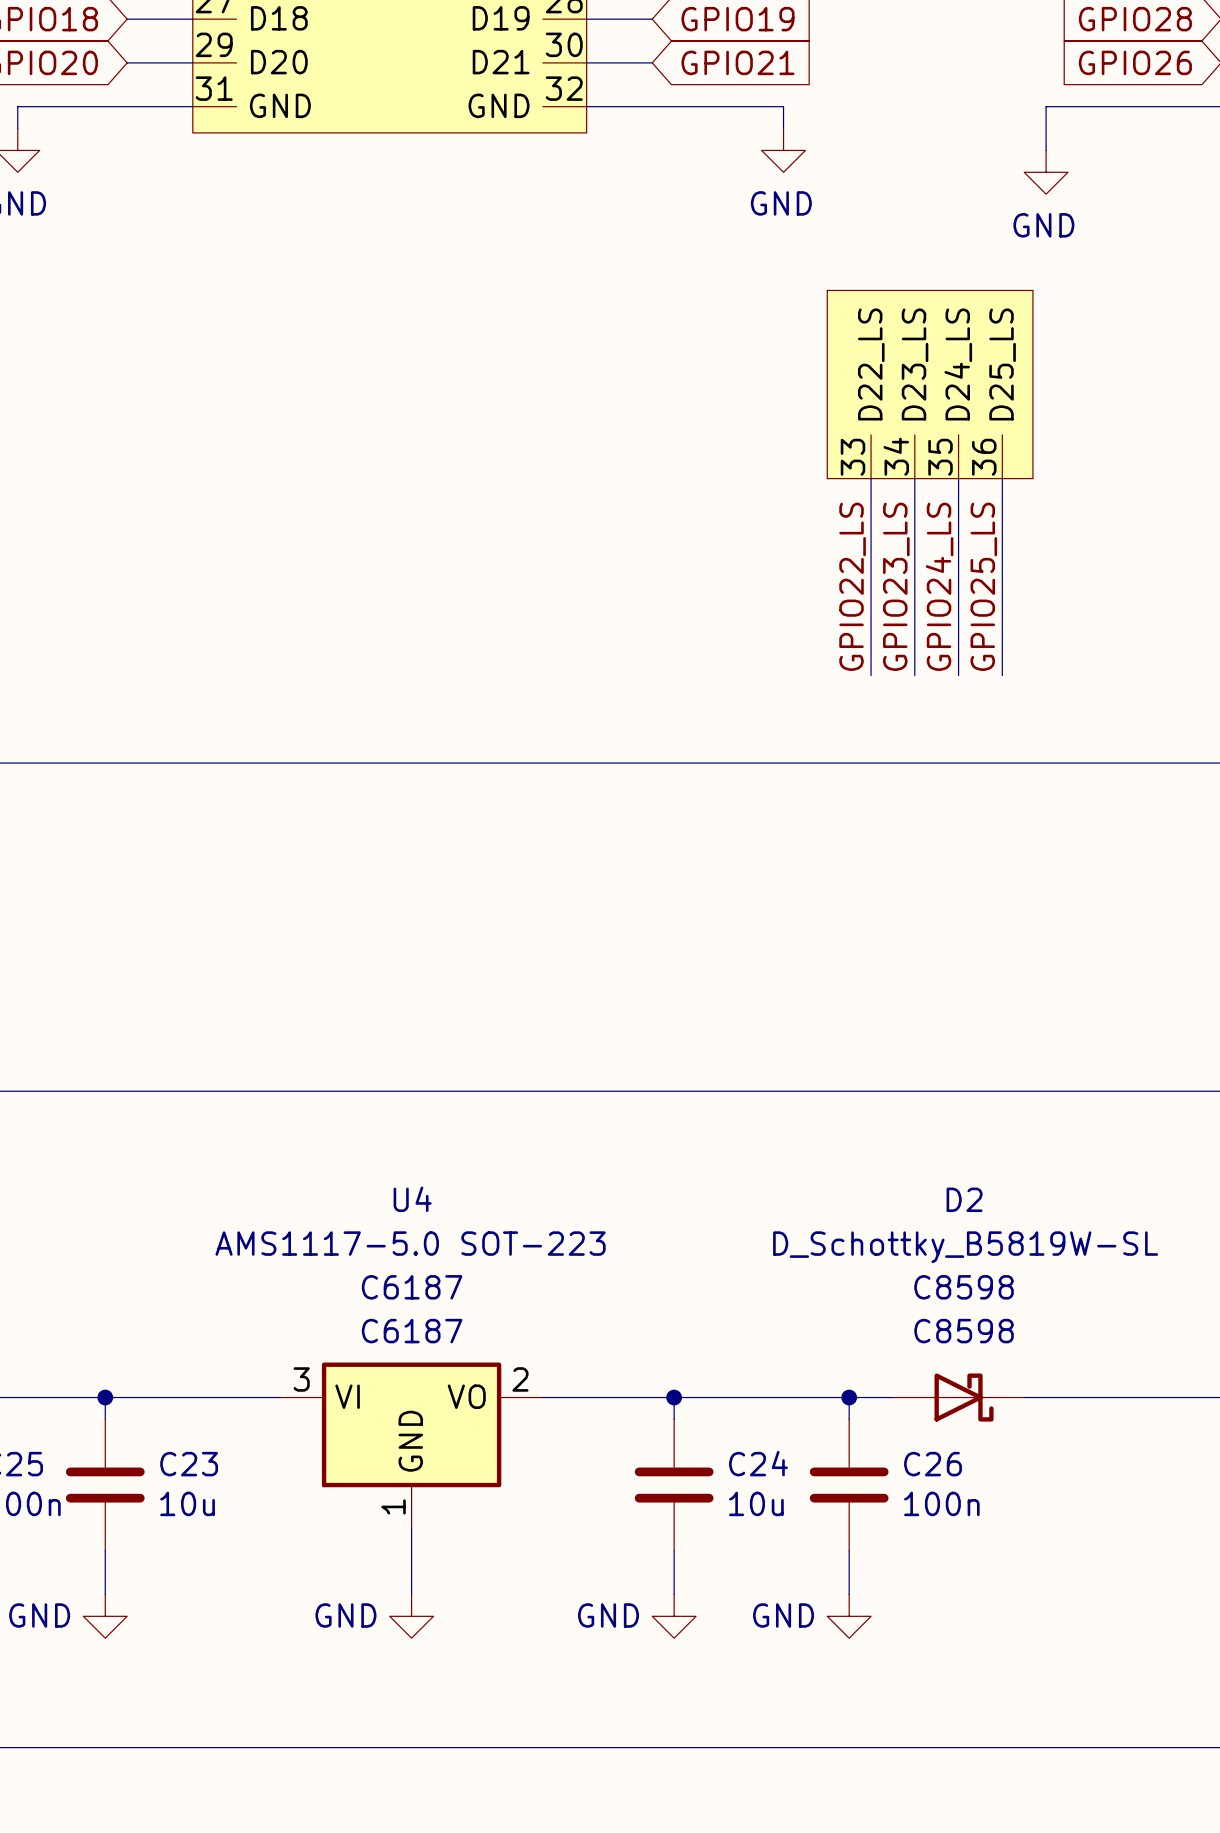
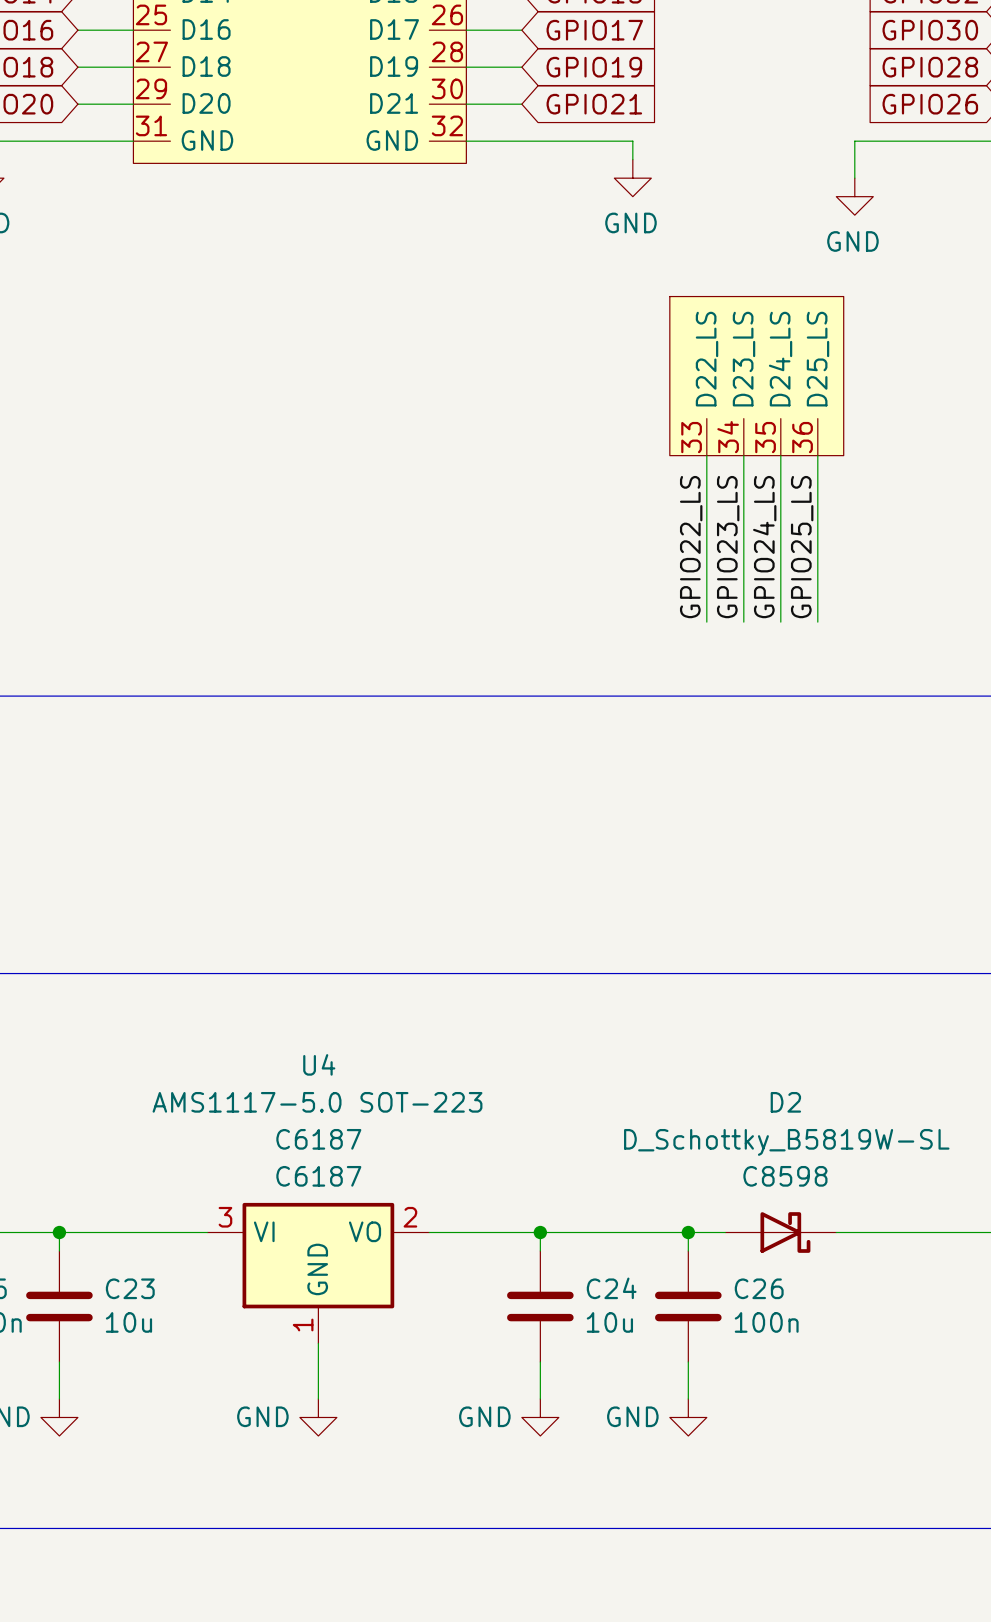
D2 name position: D2 (964, 1199) -> D2 (785, 1102)
D2 value position: D_Schottky_B5819W-SL (965, 1247) -> D_Schottky_B5819W-SL (786, 1142)
D2 text position: C8598 (964, 1287) -> C8598 (785, 1176)

